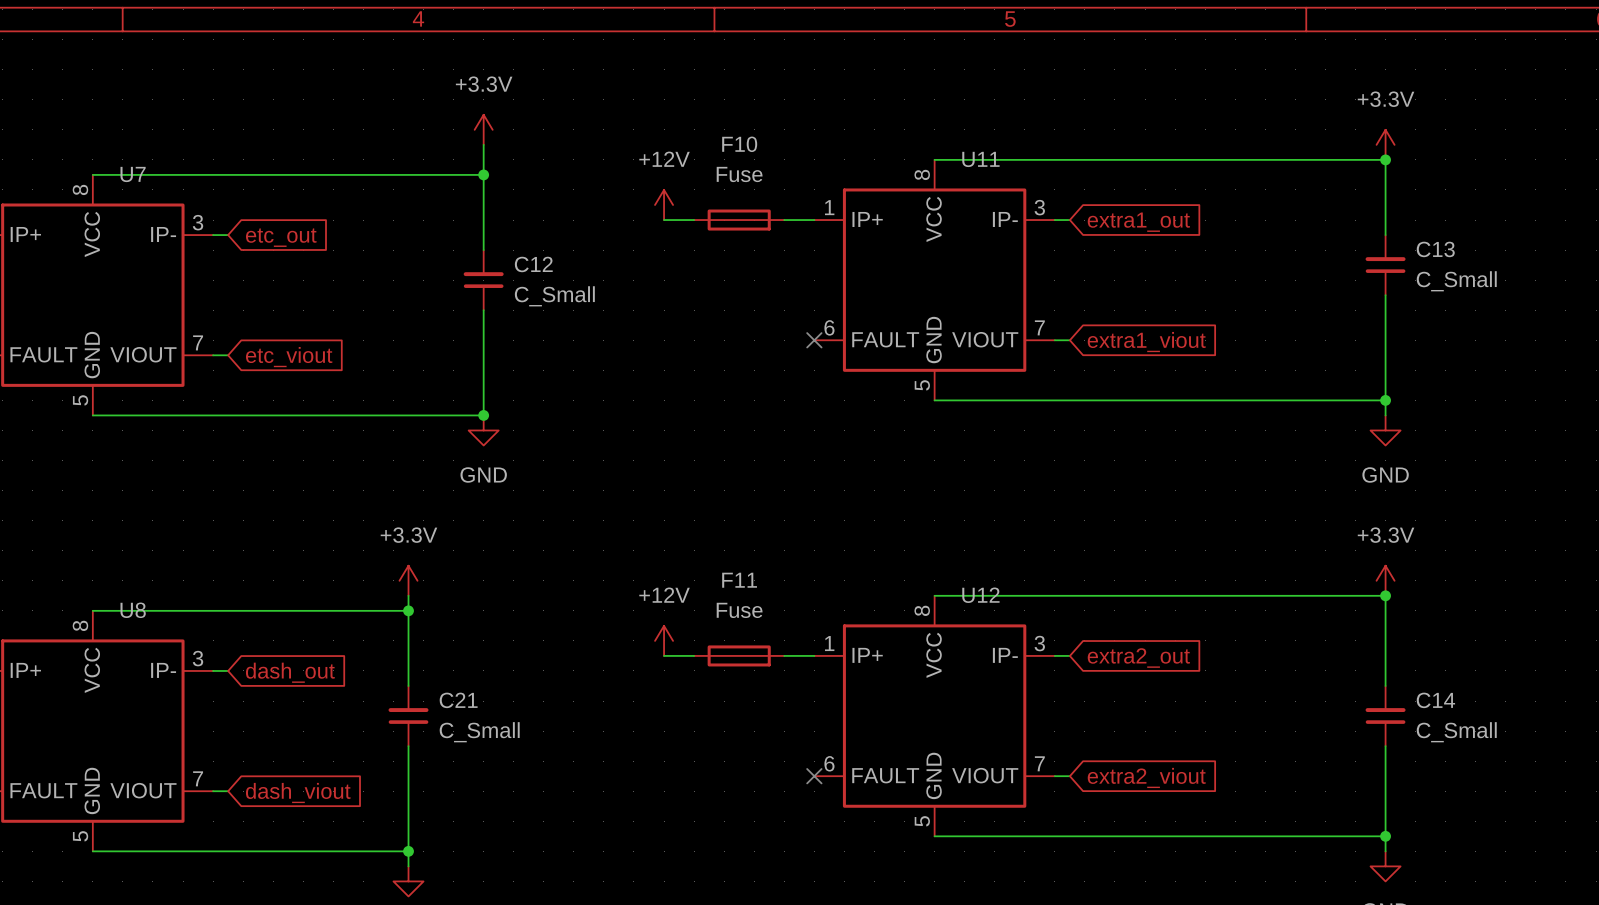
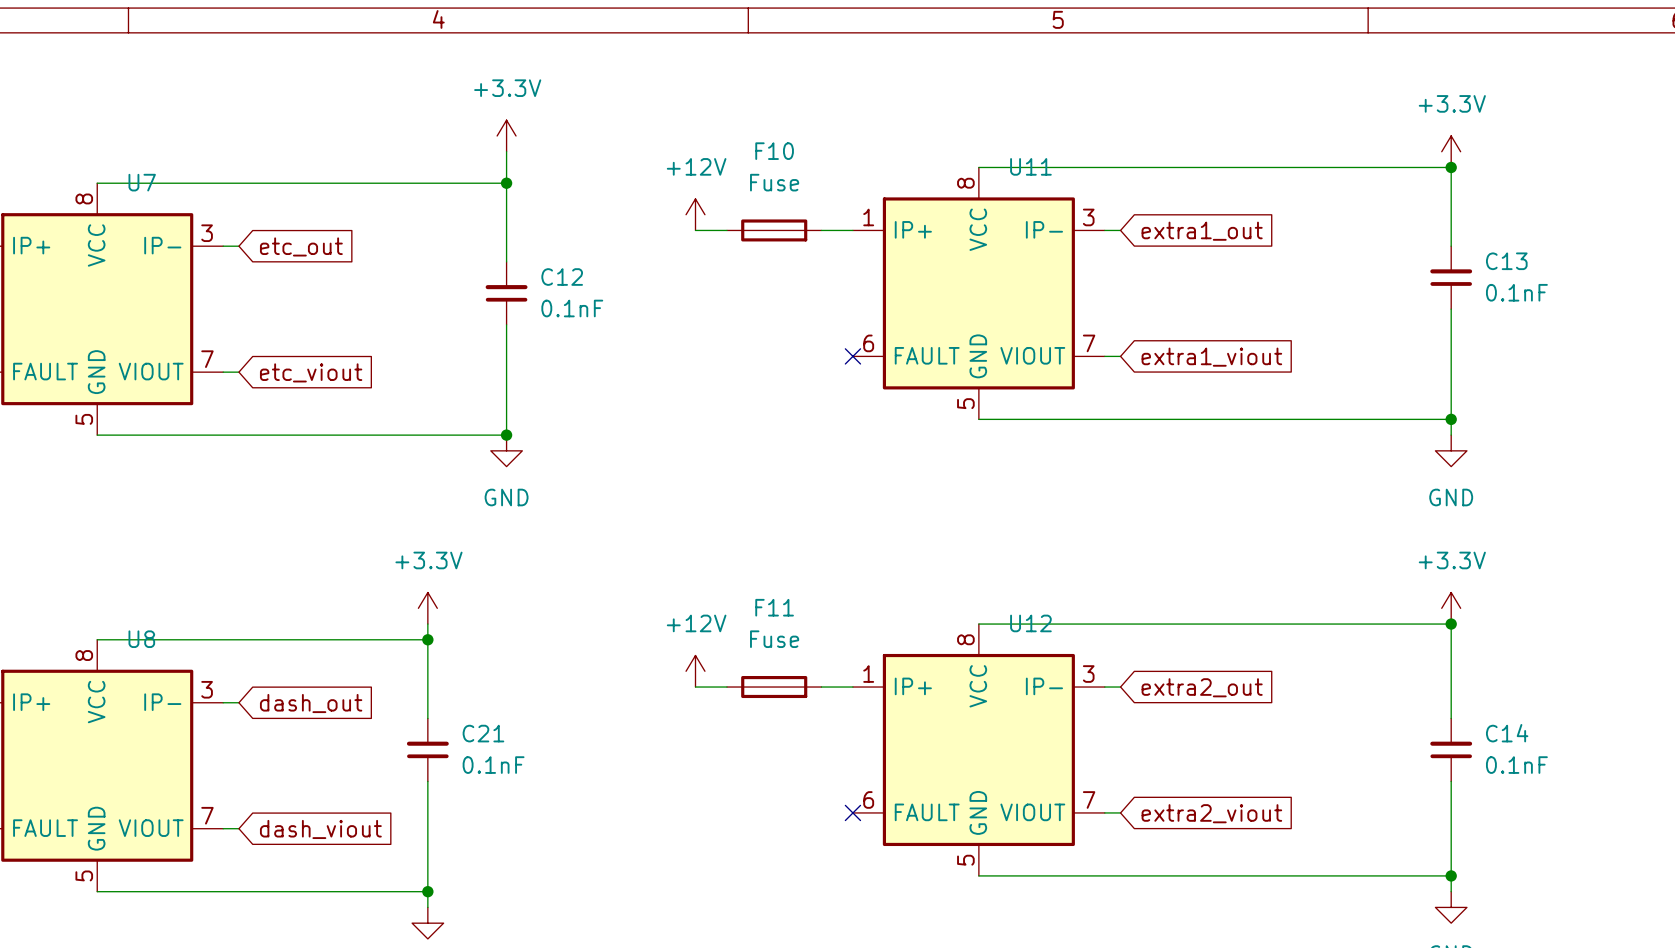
C13 value: C_Small (1456, 281) -> 0.1nF (1516, 292)
C12 value: C_Small (554, 296) -> 0.1nF (572, 308)
C21 value: C_Small (479, 732) -> 0.1nF (493, 765)
C14 value: C_Small (1456, 732) -> 0.1nF (1516, 765)

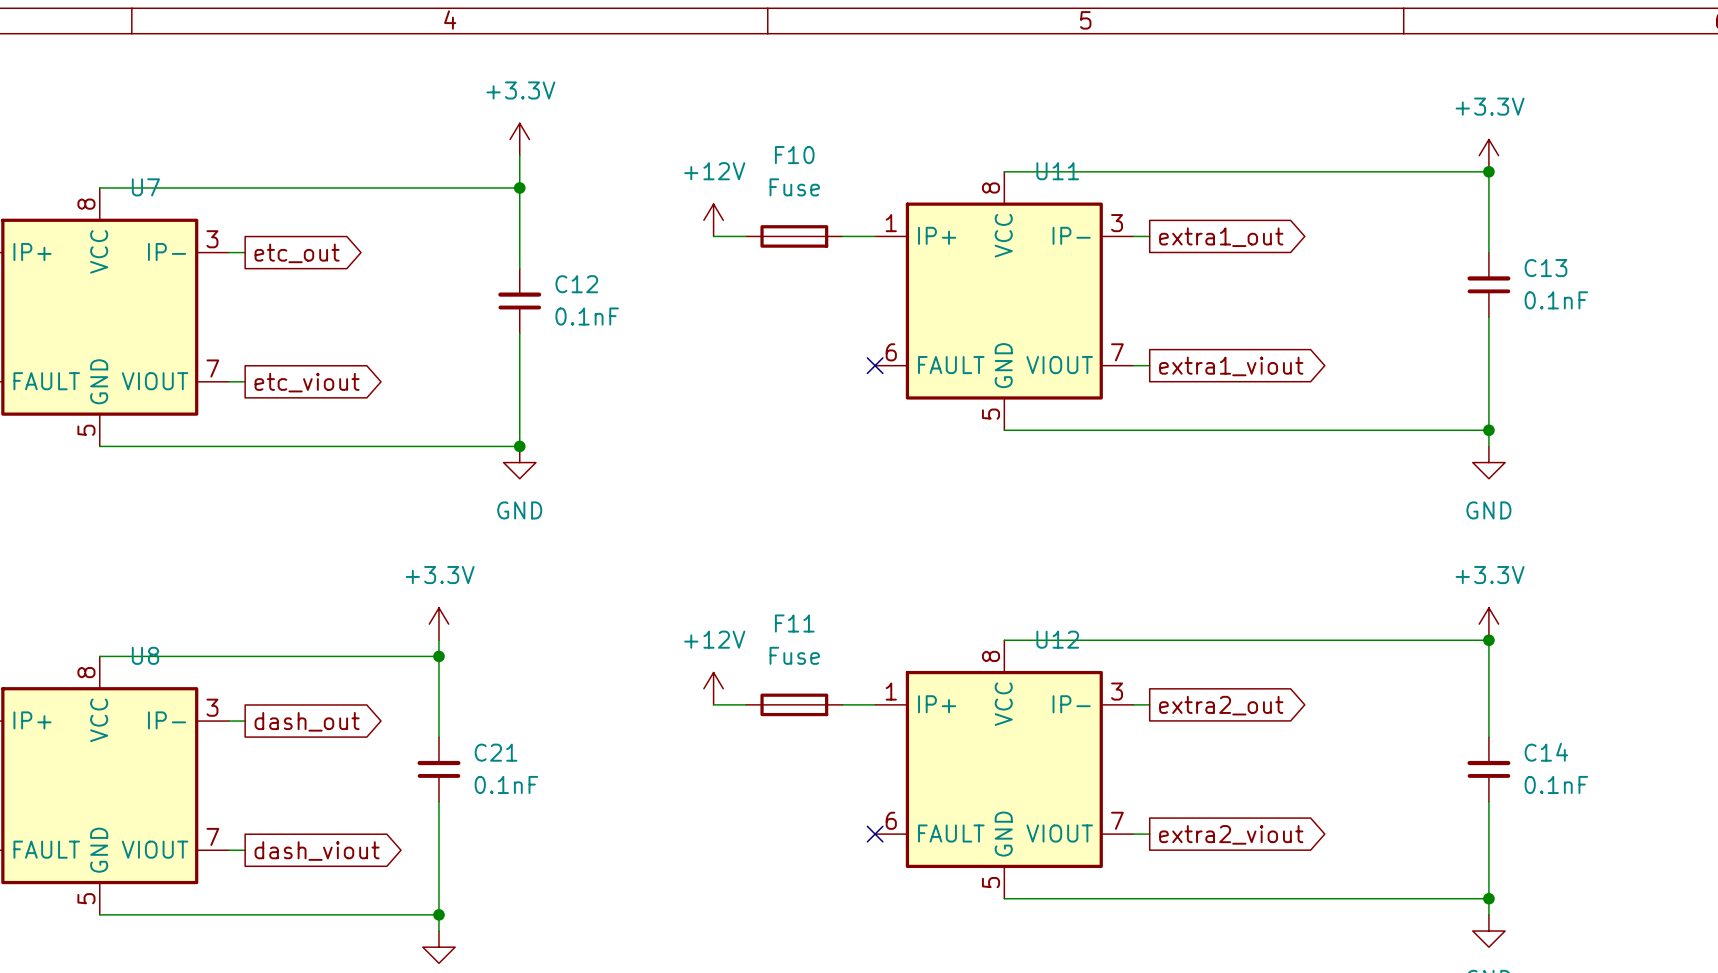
global label shape: input (1202, 231) -> output (1221, 237)
global label shape: input (301, 246) -> output (297, 253)
global label shape: input (1211, 357) -> output (1231, 366)
global label shape: input (311, 372) -> output (307, 382)
global label shape: input (1202, 687) -> output (1221, 705)
global label shape: input (311, 703) -> output (307, 721)
global label shape: input (1211, 813) -> output (1231, 834)
global label shape: input (320, 829) -> output (317, 851)

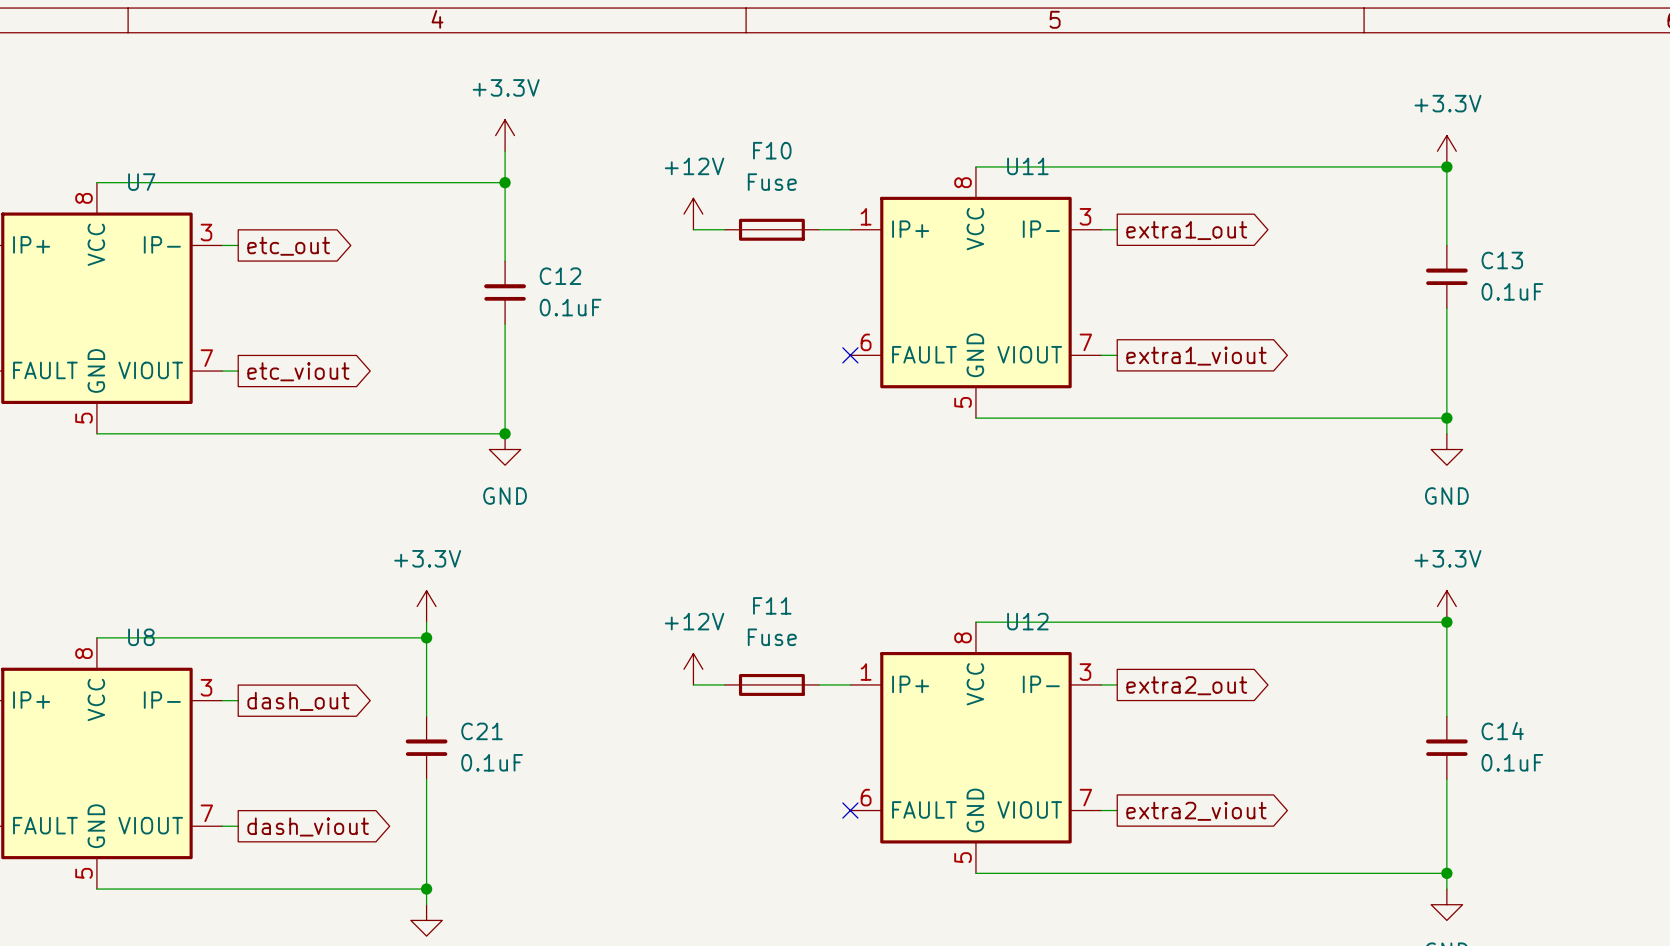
C13 value: 0.1nF (1556, 300) -> 0.1uF (1512, 291)
C12 value: 0.1nF (587, 316) -> 0.1uF (570, 307)
C21 value: 0.1nF (506, 784) -> 0.1uF (492, 762)
C14 value: 0.1nF (1556, 784) -> 0.1uF (1512, 762)

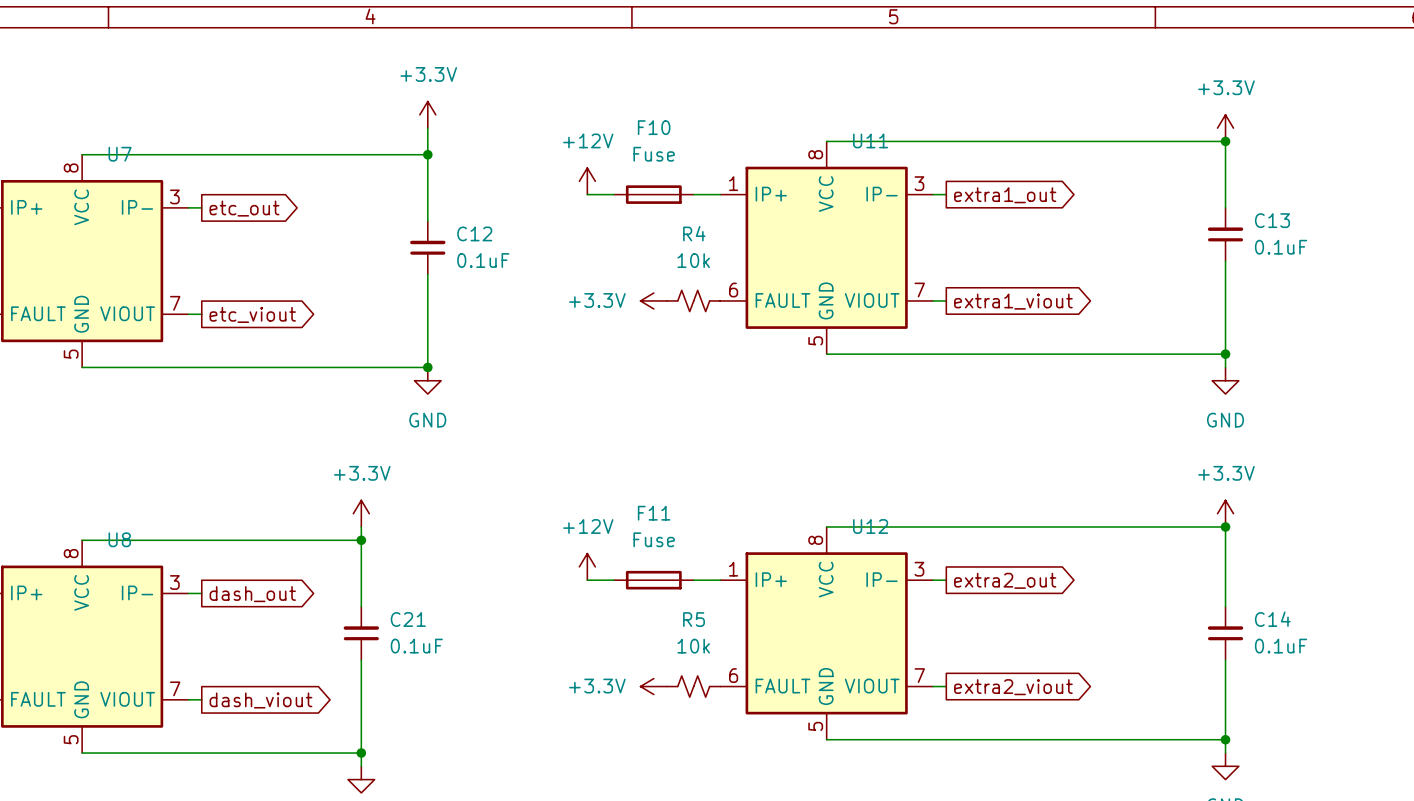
power symbol: none -> +3.3V (653, 300)
R4: none -> 10k (693, 300)
no-connect mark: (850, 355) -> none
power symbol: none -> +3.3V (653, 686)
R5: none -> 10k (693, 686)
no-connect mark: (850, 810) -> none

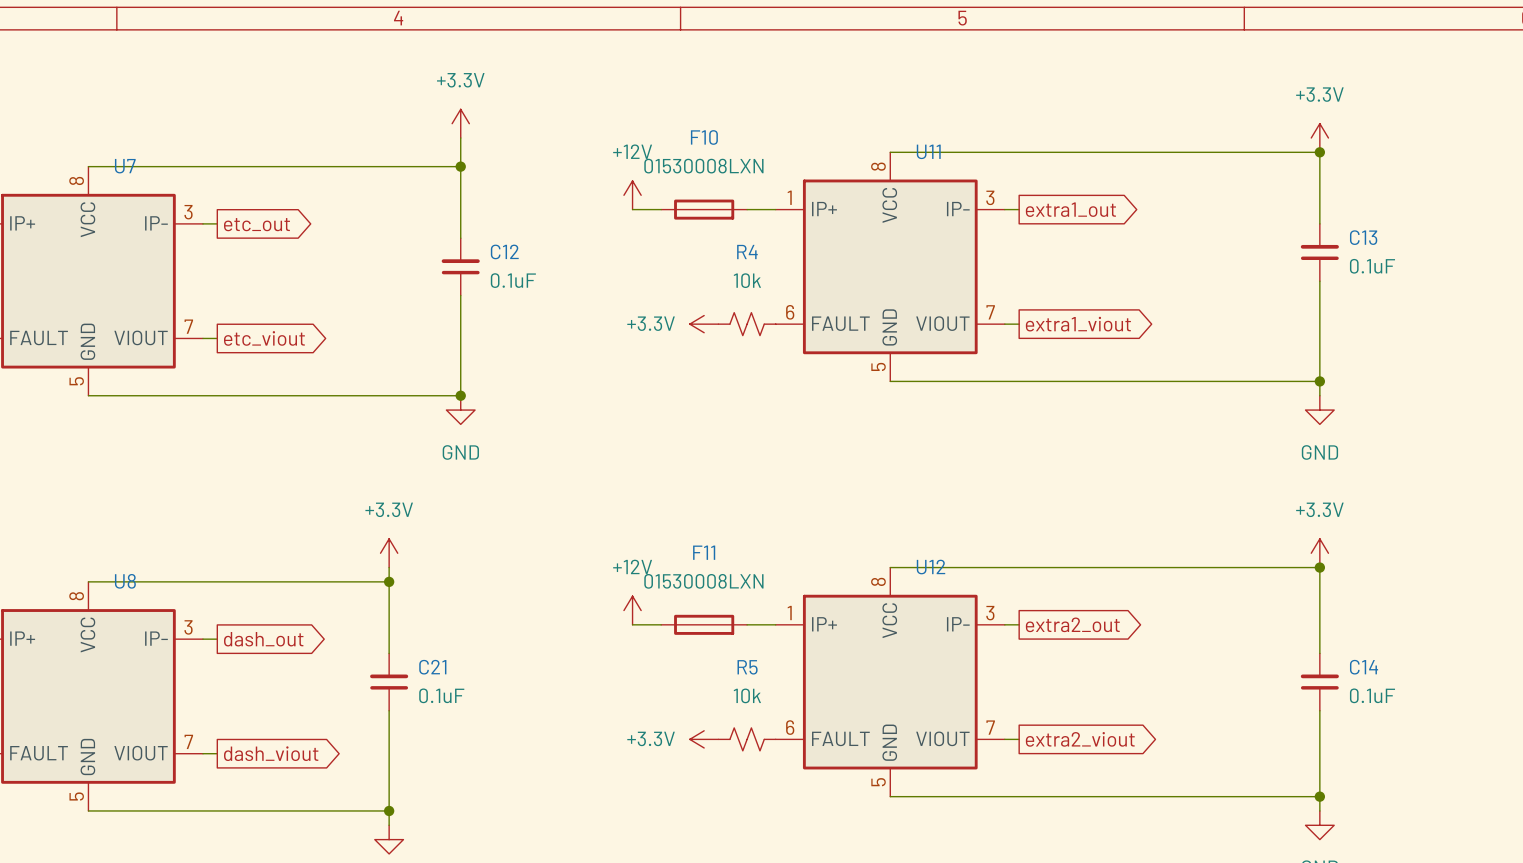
F10 value: Fuse (654, 154) -> 01530008LXN (703, 166)
F11 value: Fuse (654, 539) -> 01530008LXN (703, 581)

